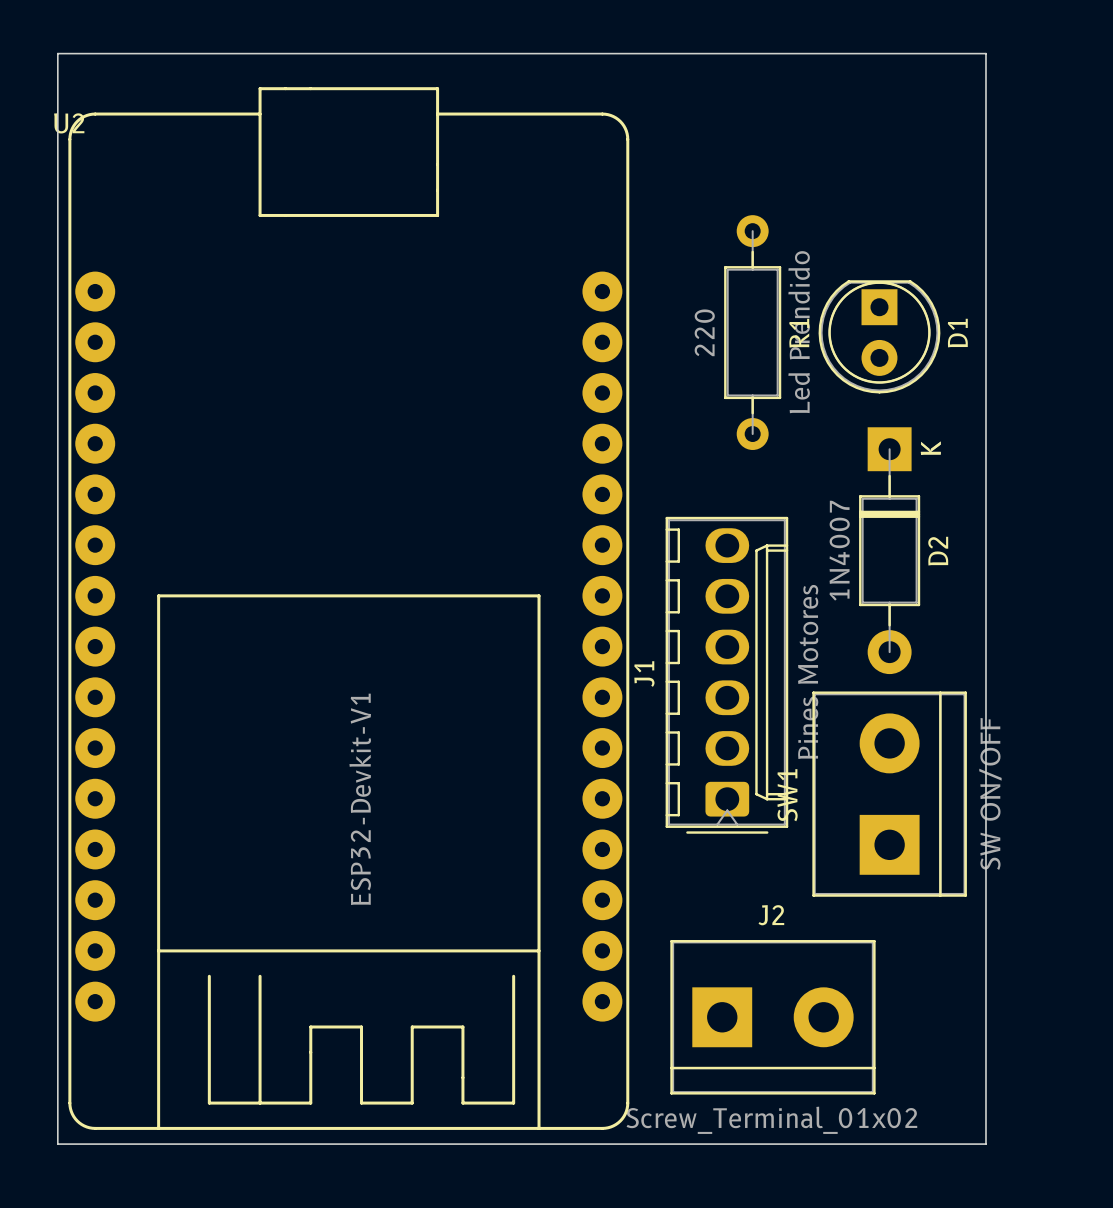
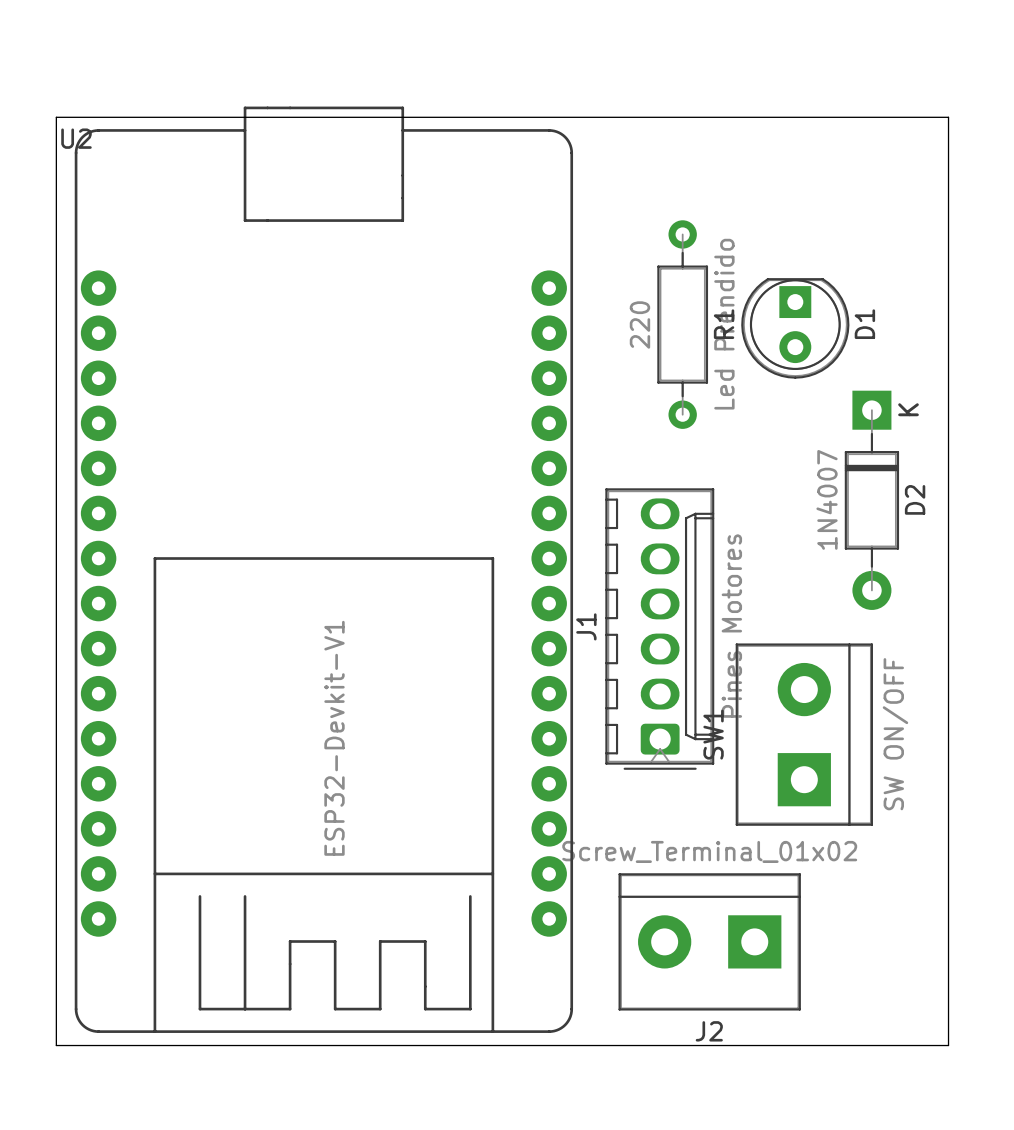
D2 position: (889, 550) -> (871, 500)
J2 rotation: 0° (772, 1017) -> 180° (709, 941)
board edge: (57, 1144) (57, 53) (985, 53) (985, 1144) -> (65, 1045) (56, 1045) (56, 117) (948, 117) (948, 1045) (889, 1045)

